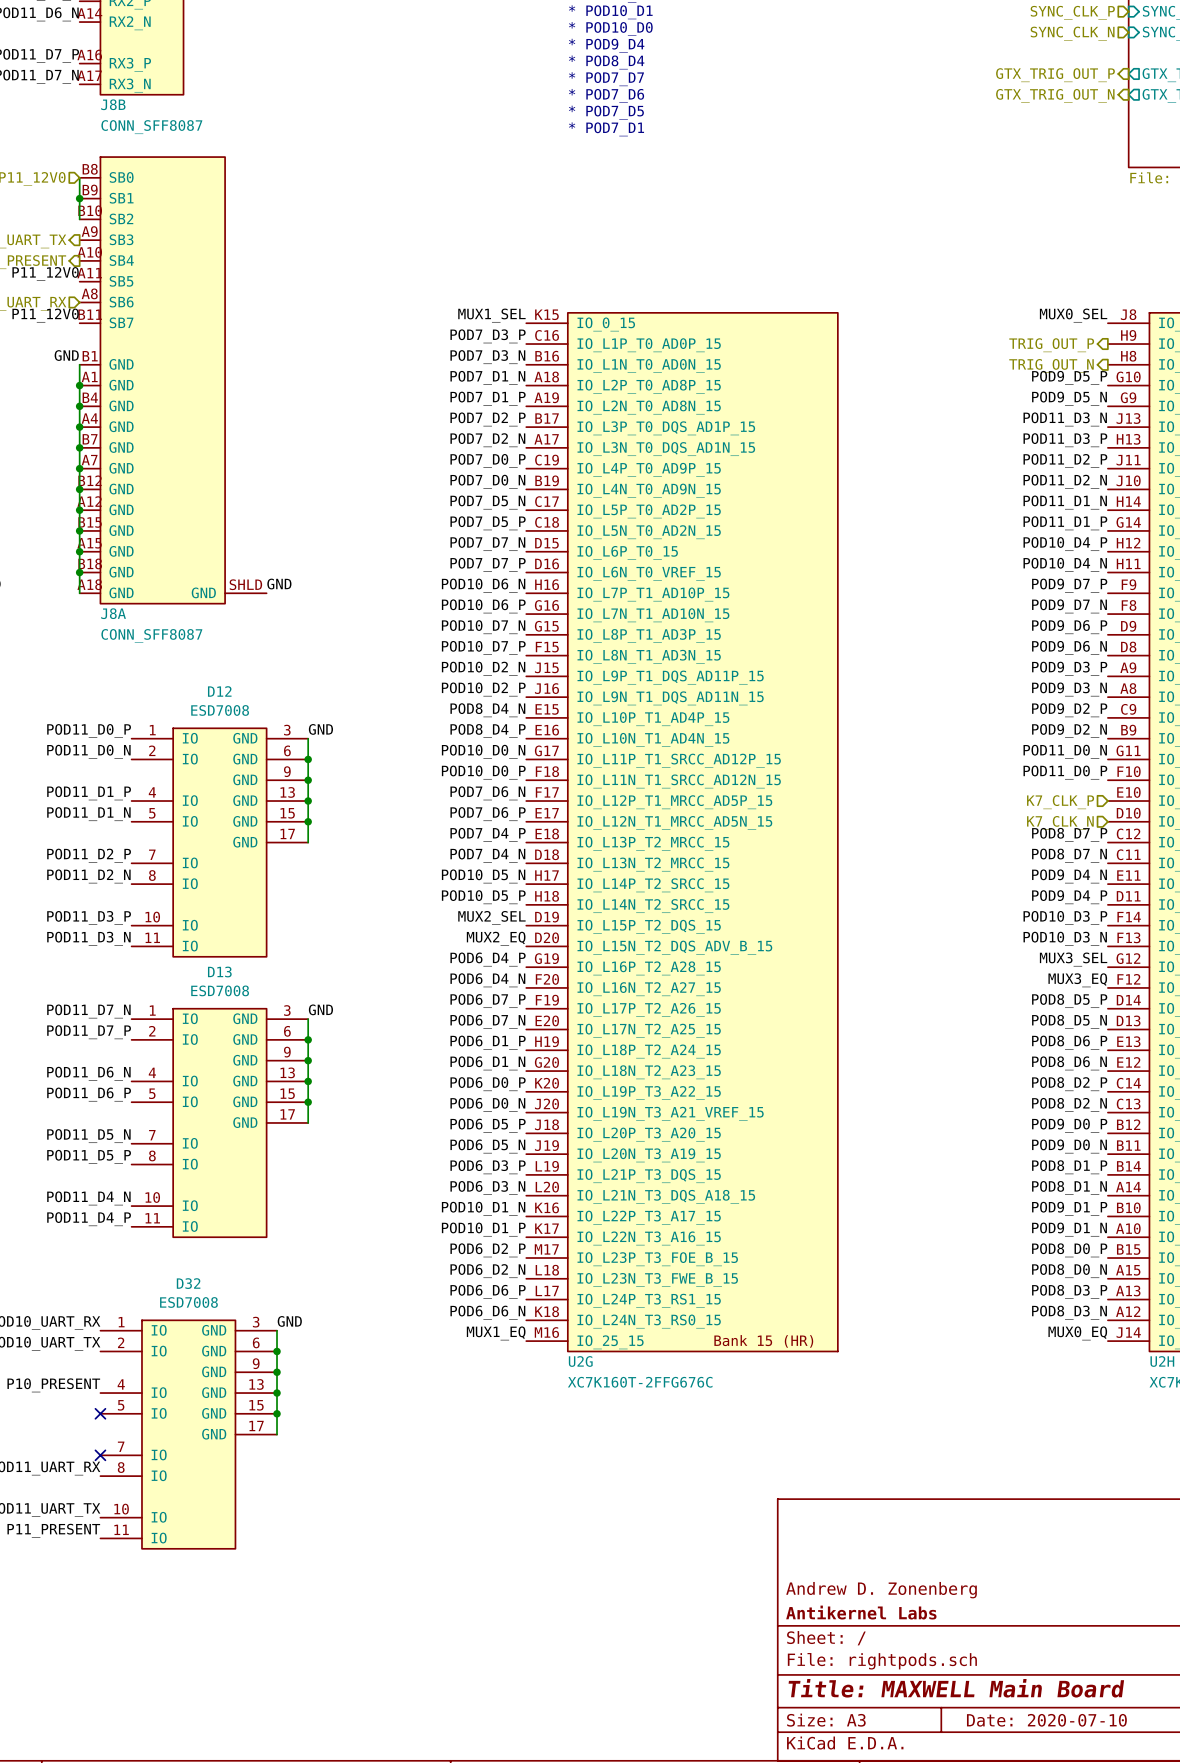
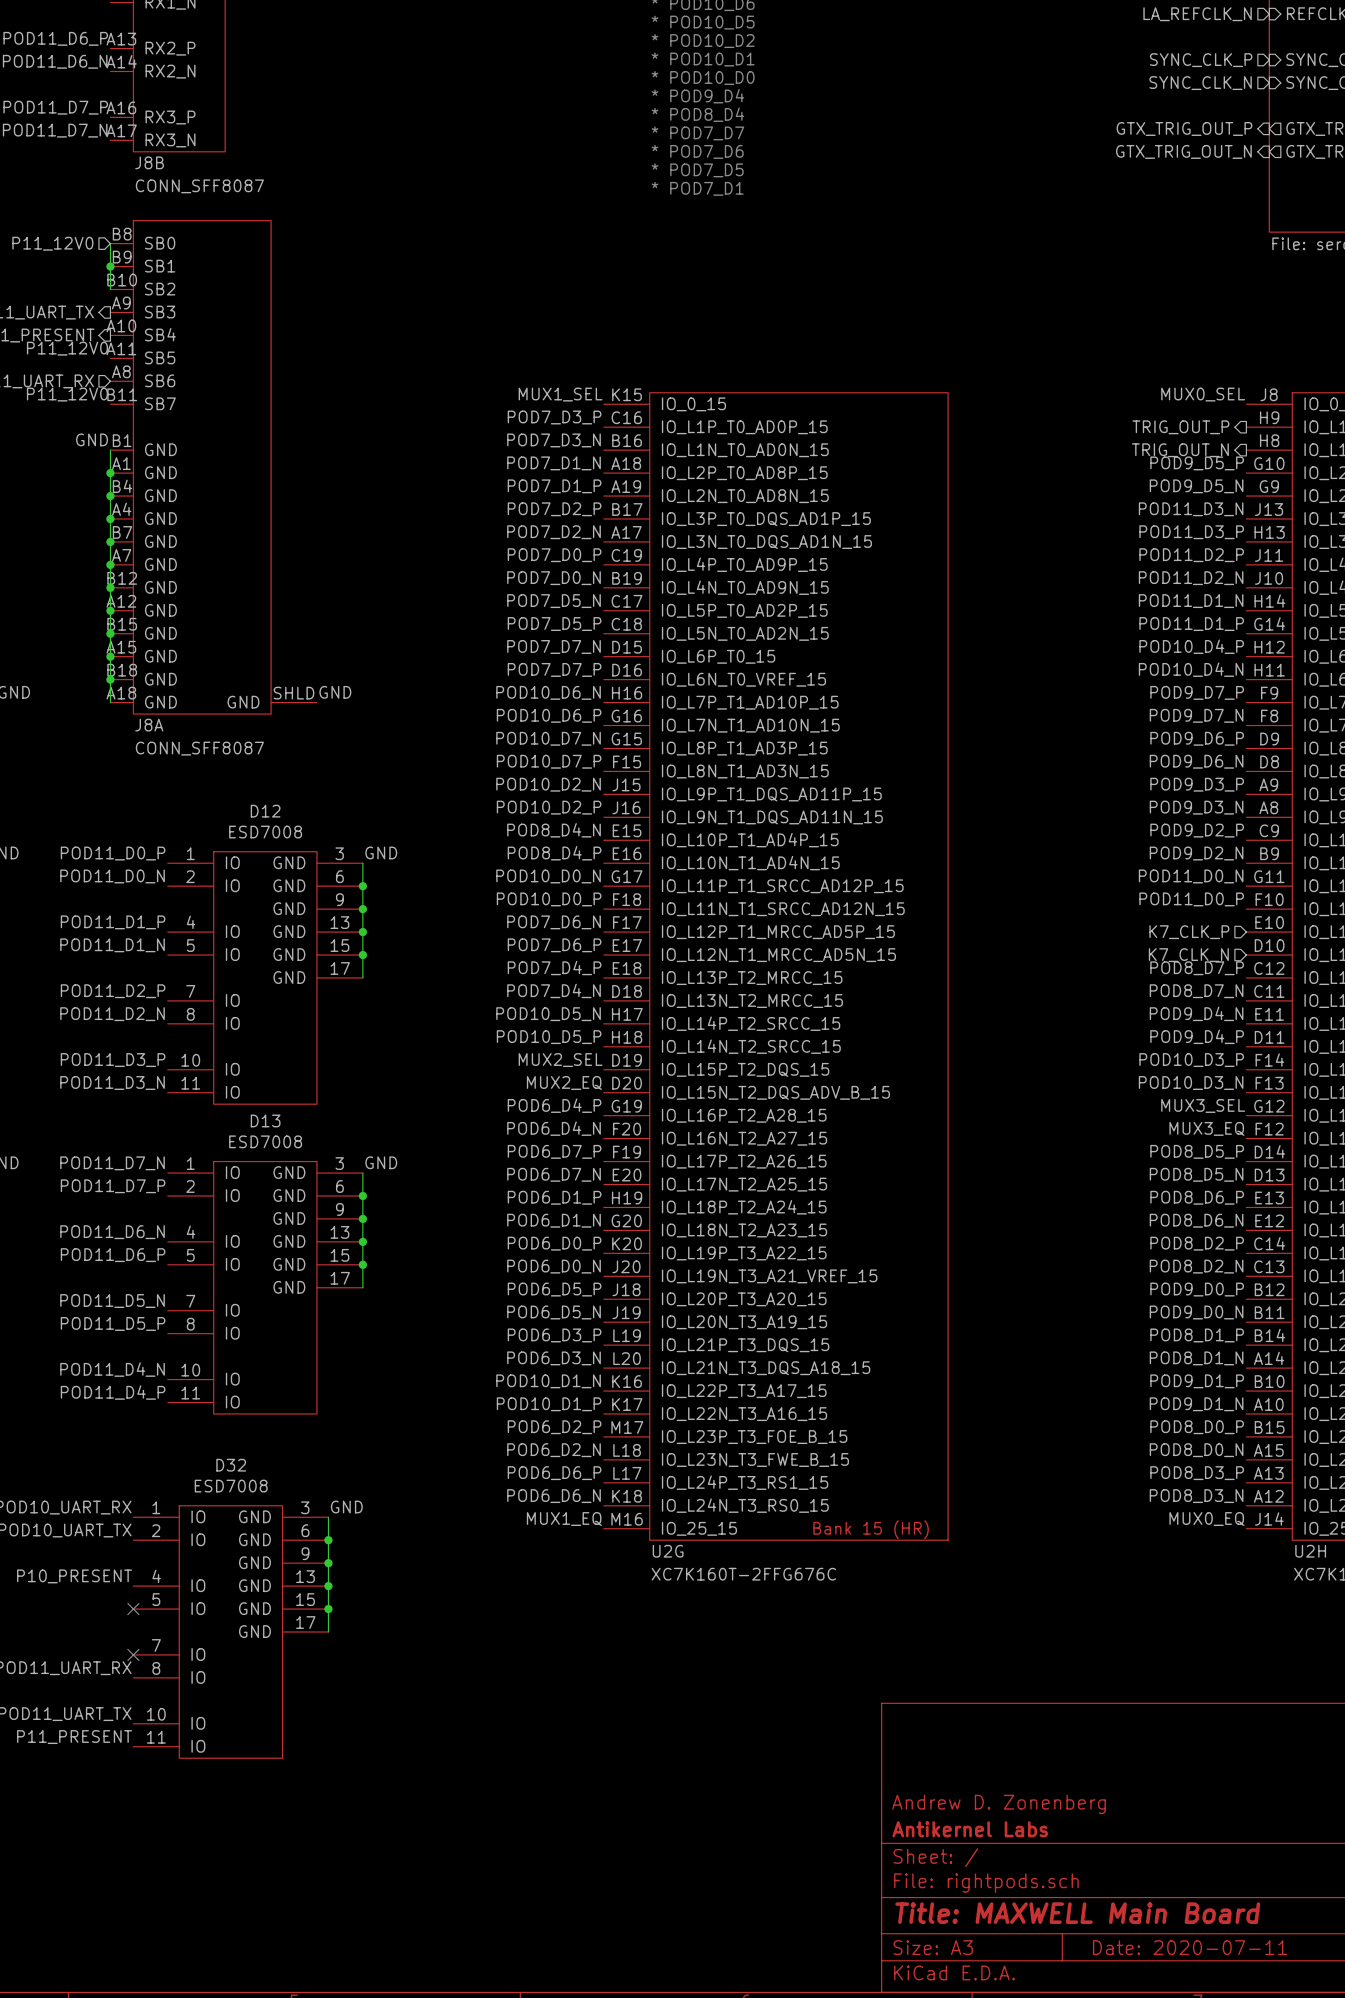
title block: Date: 2020-07-10 (1046, 1720) -> Date: 2020-07-11 (1190, 1947)

